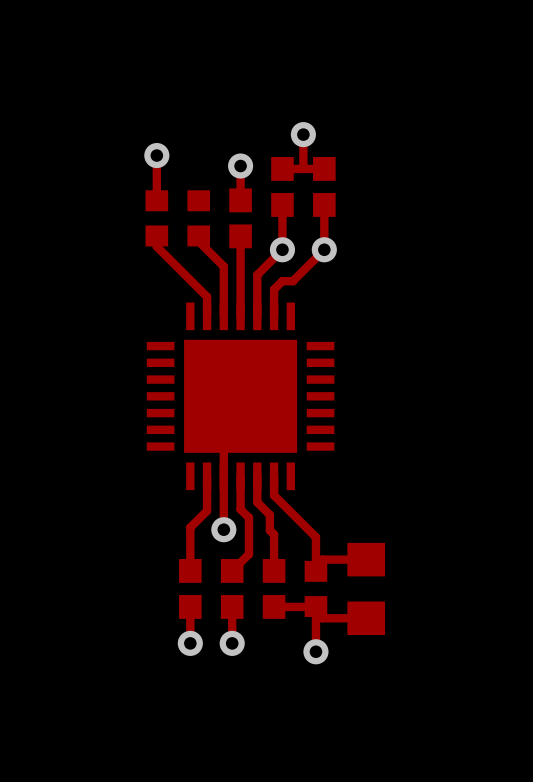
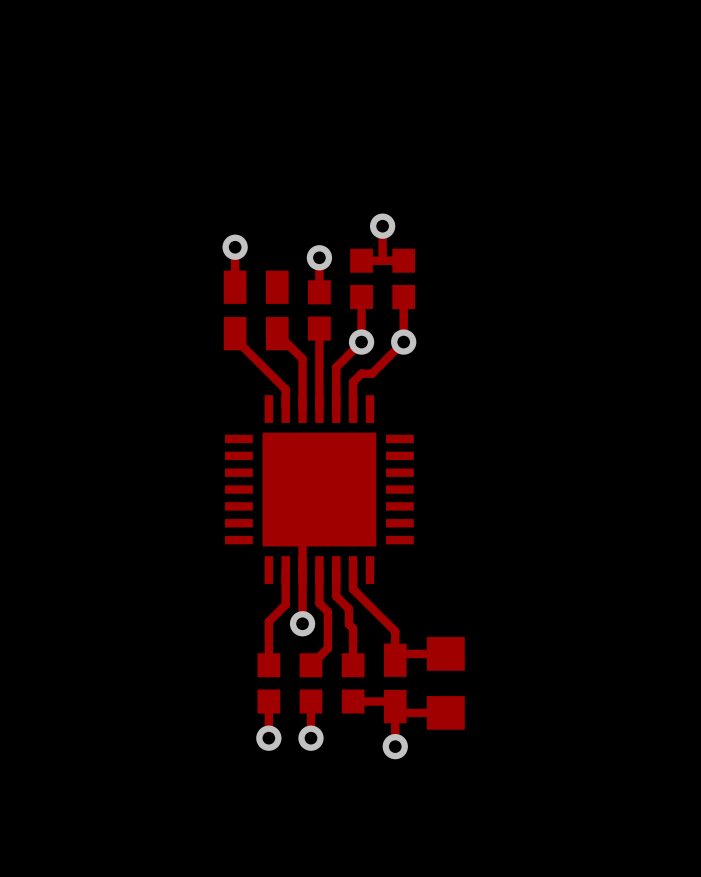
part footprint: [145, 190, 169, 247] -> [223, 270, 247, 351]
part footprint: [187, 190, 211, 247] -> [265, 270, 289, 351]
part footprint: [304, 560, 328, 618] -> [383, 643, 407, 724]

